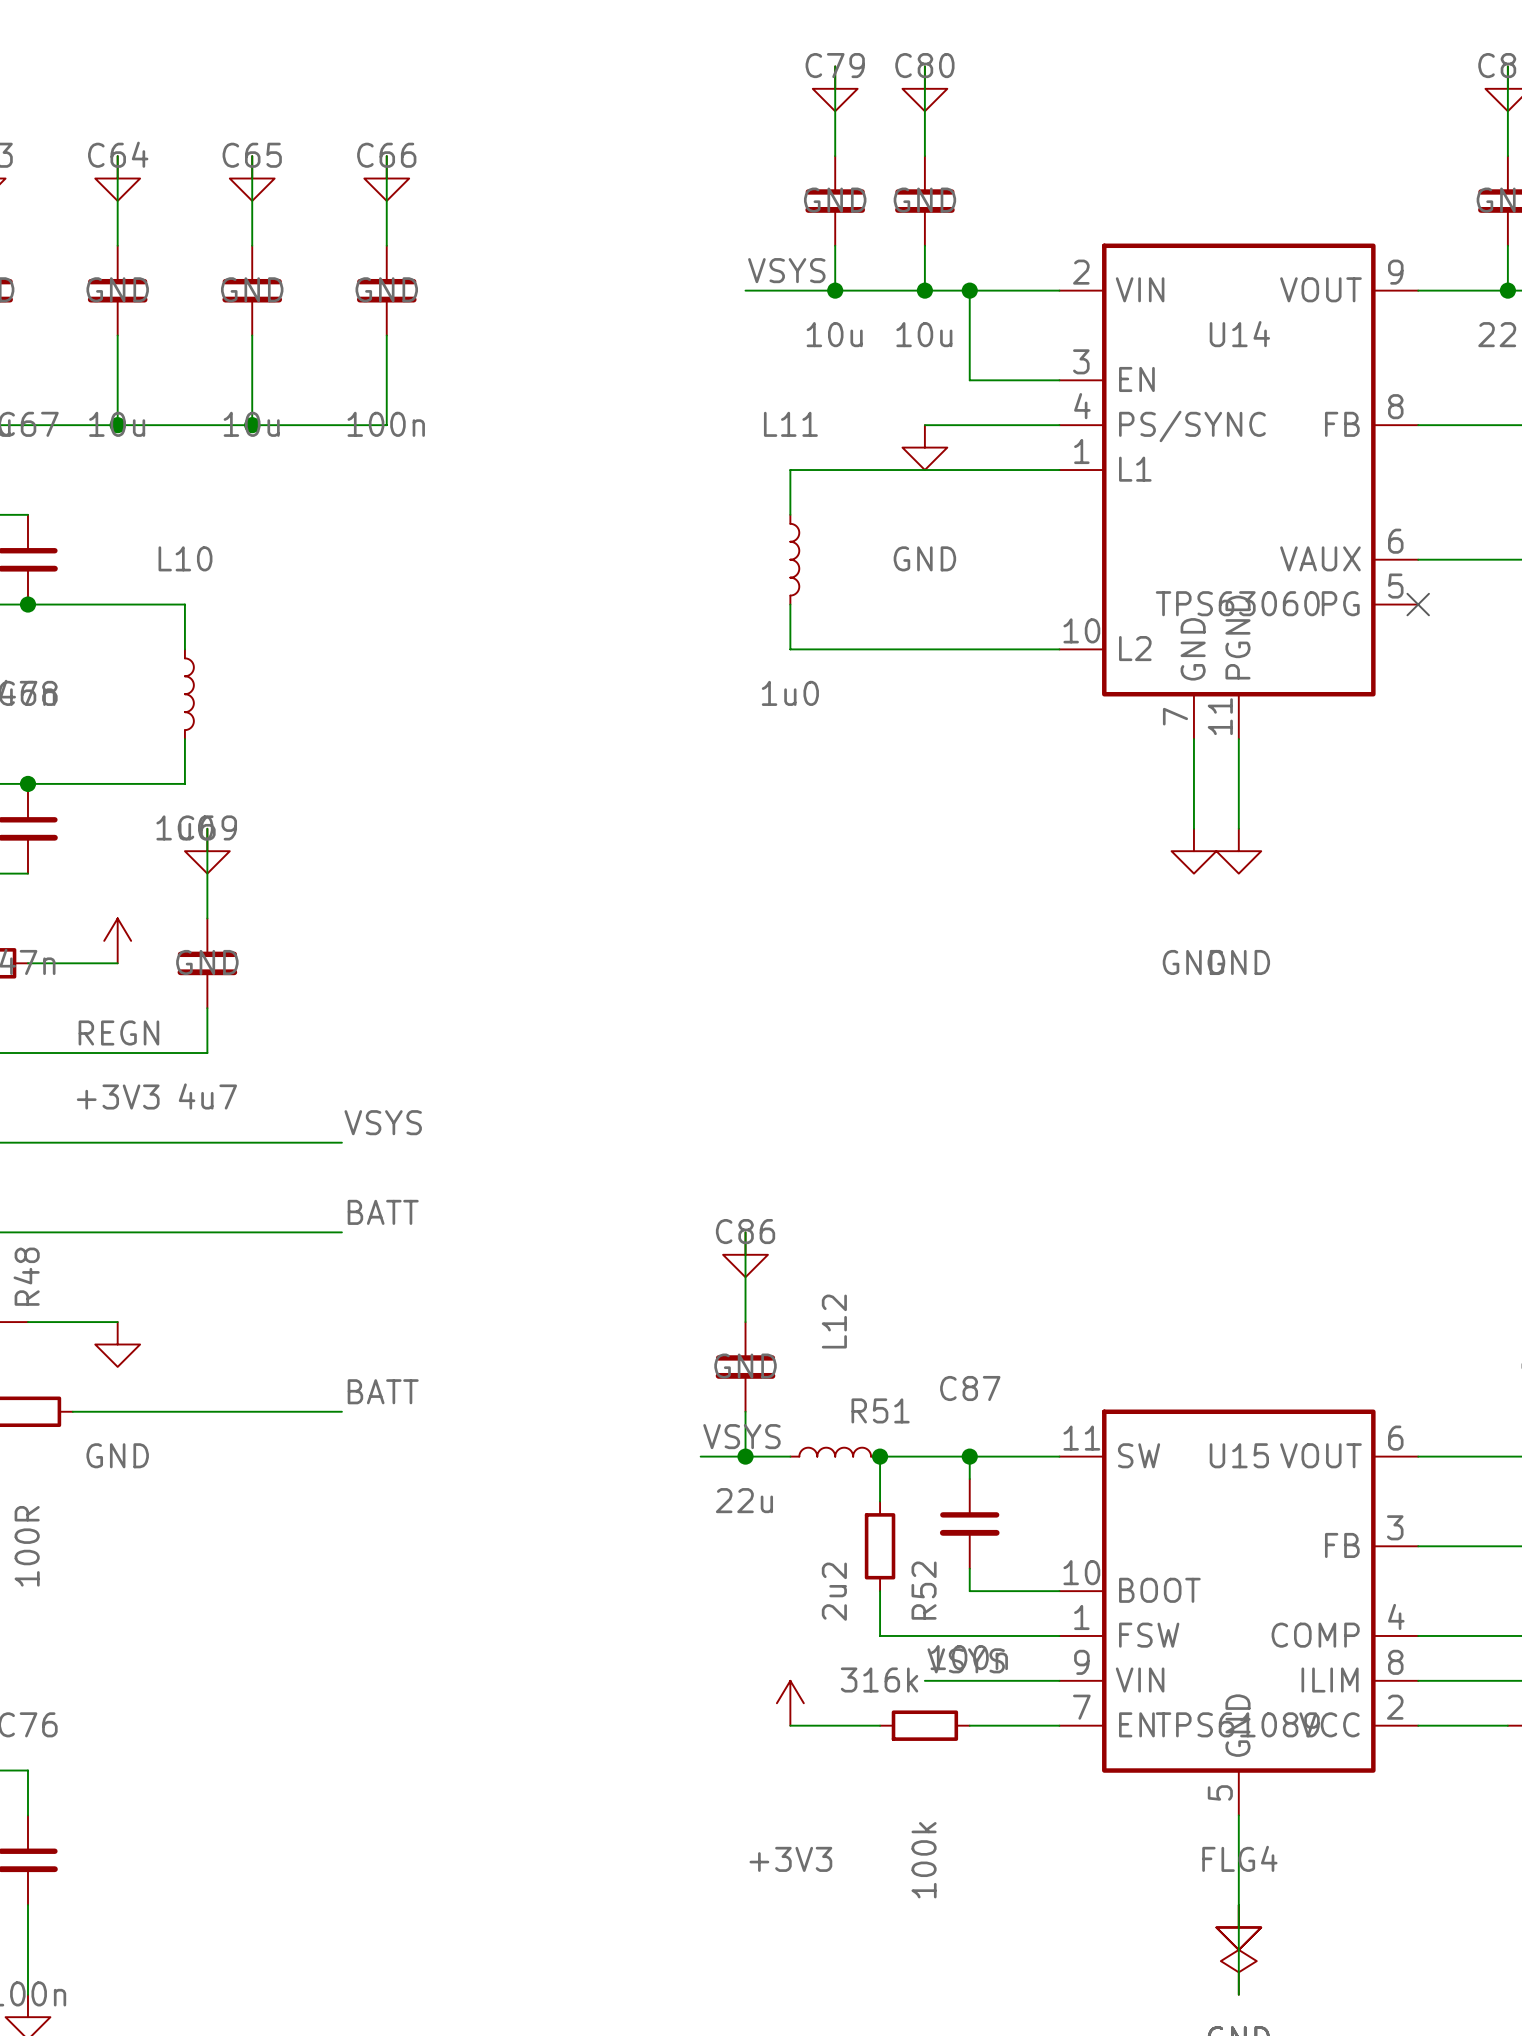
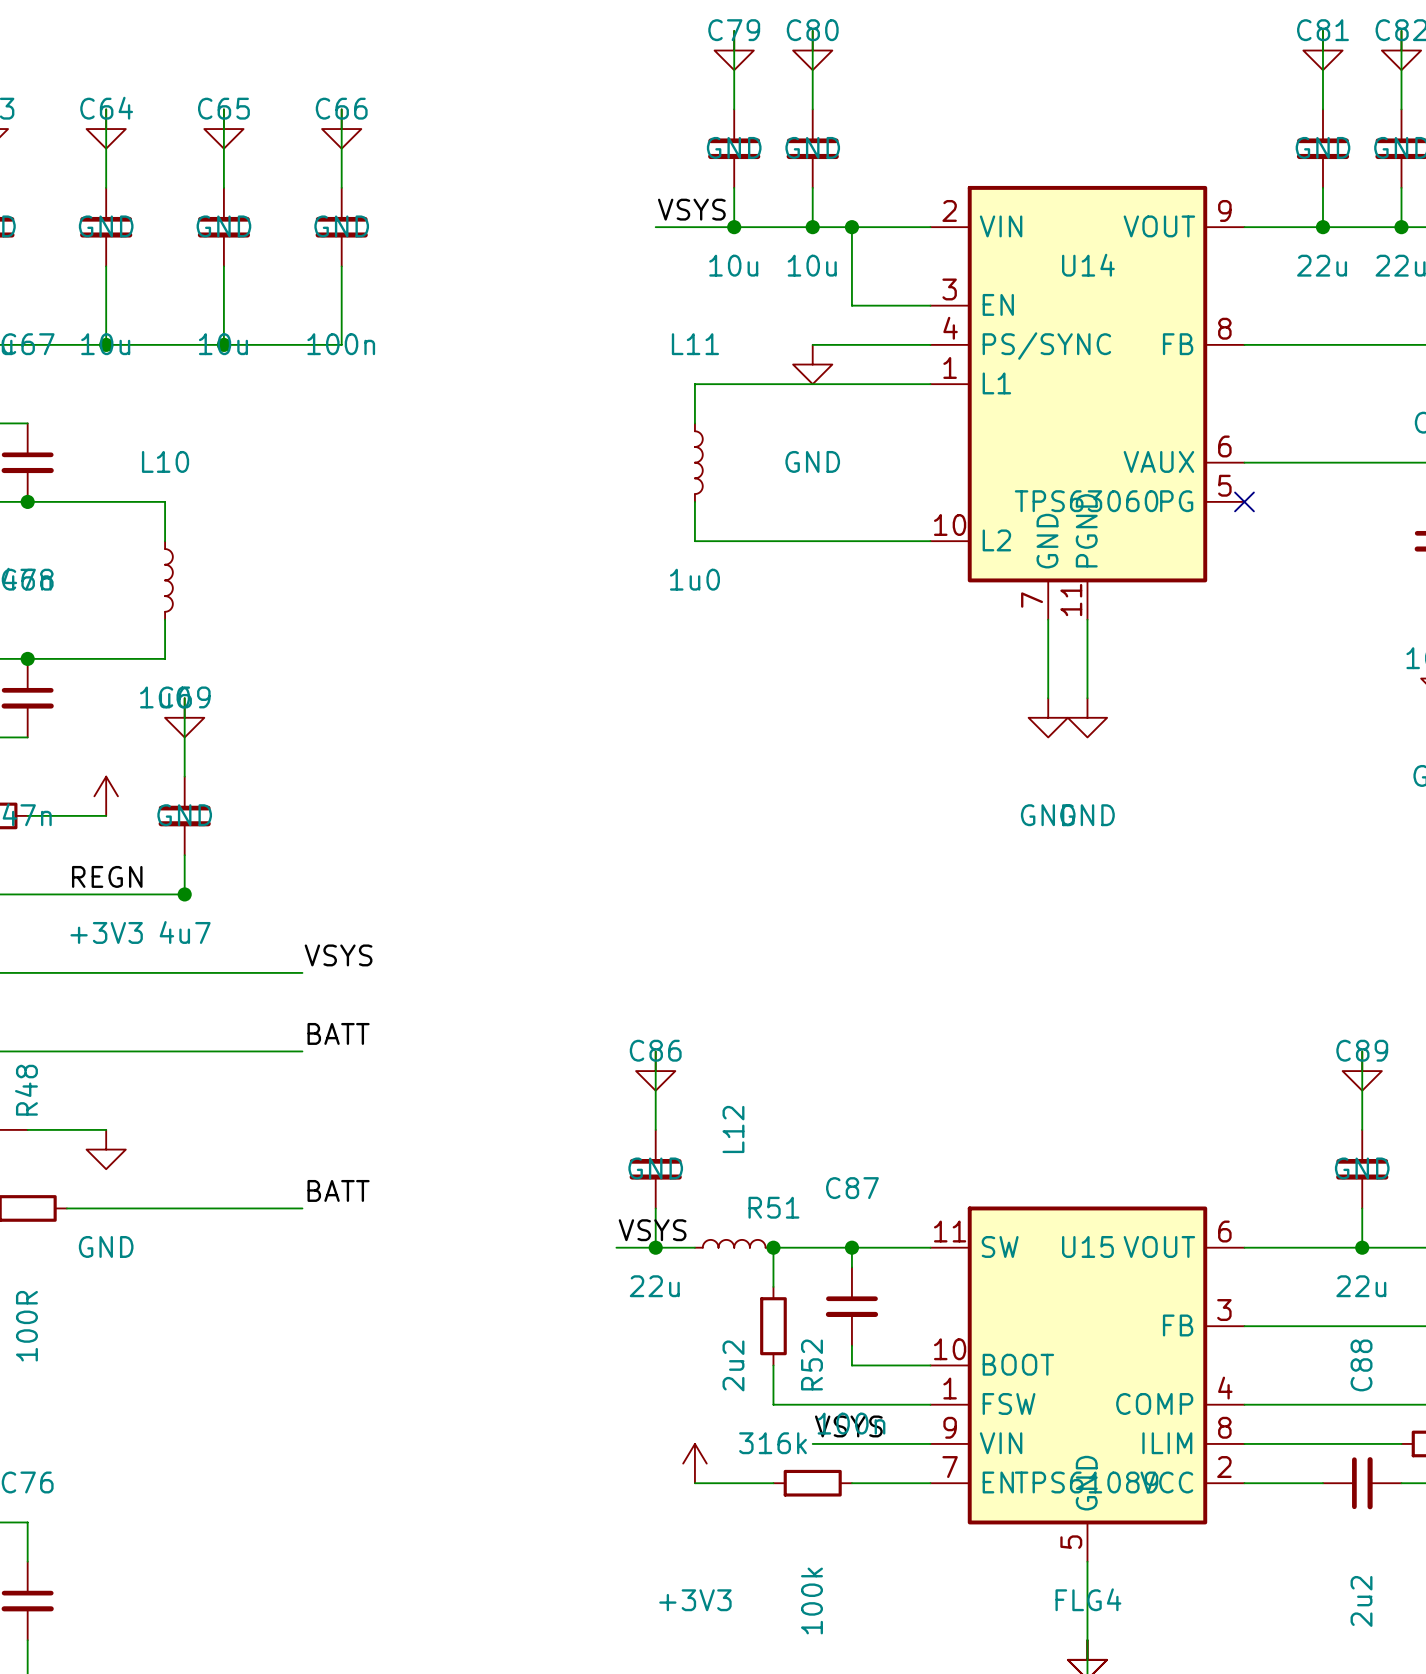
junction: none -> (184, 894)

